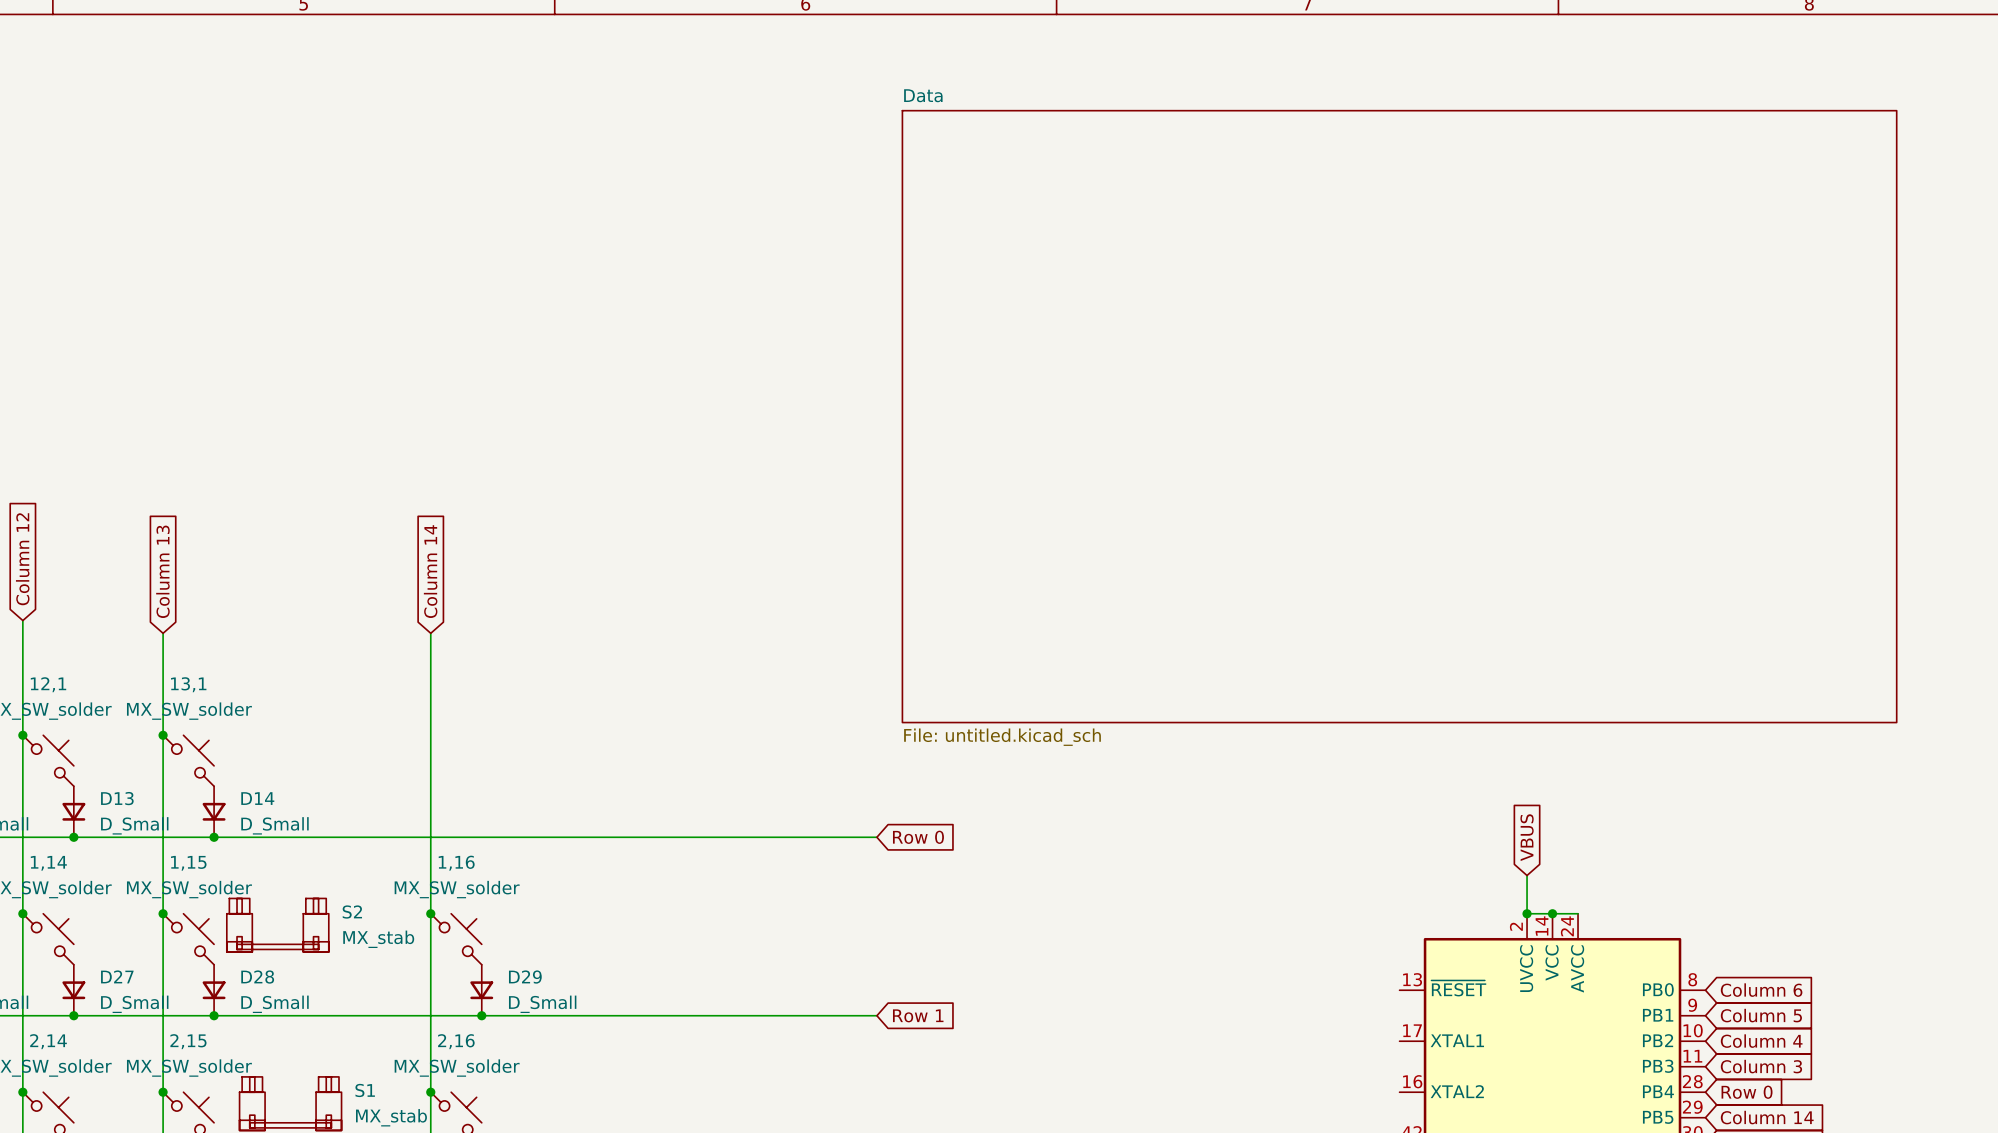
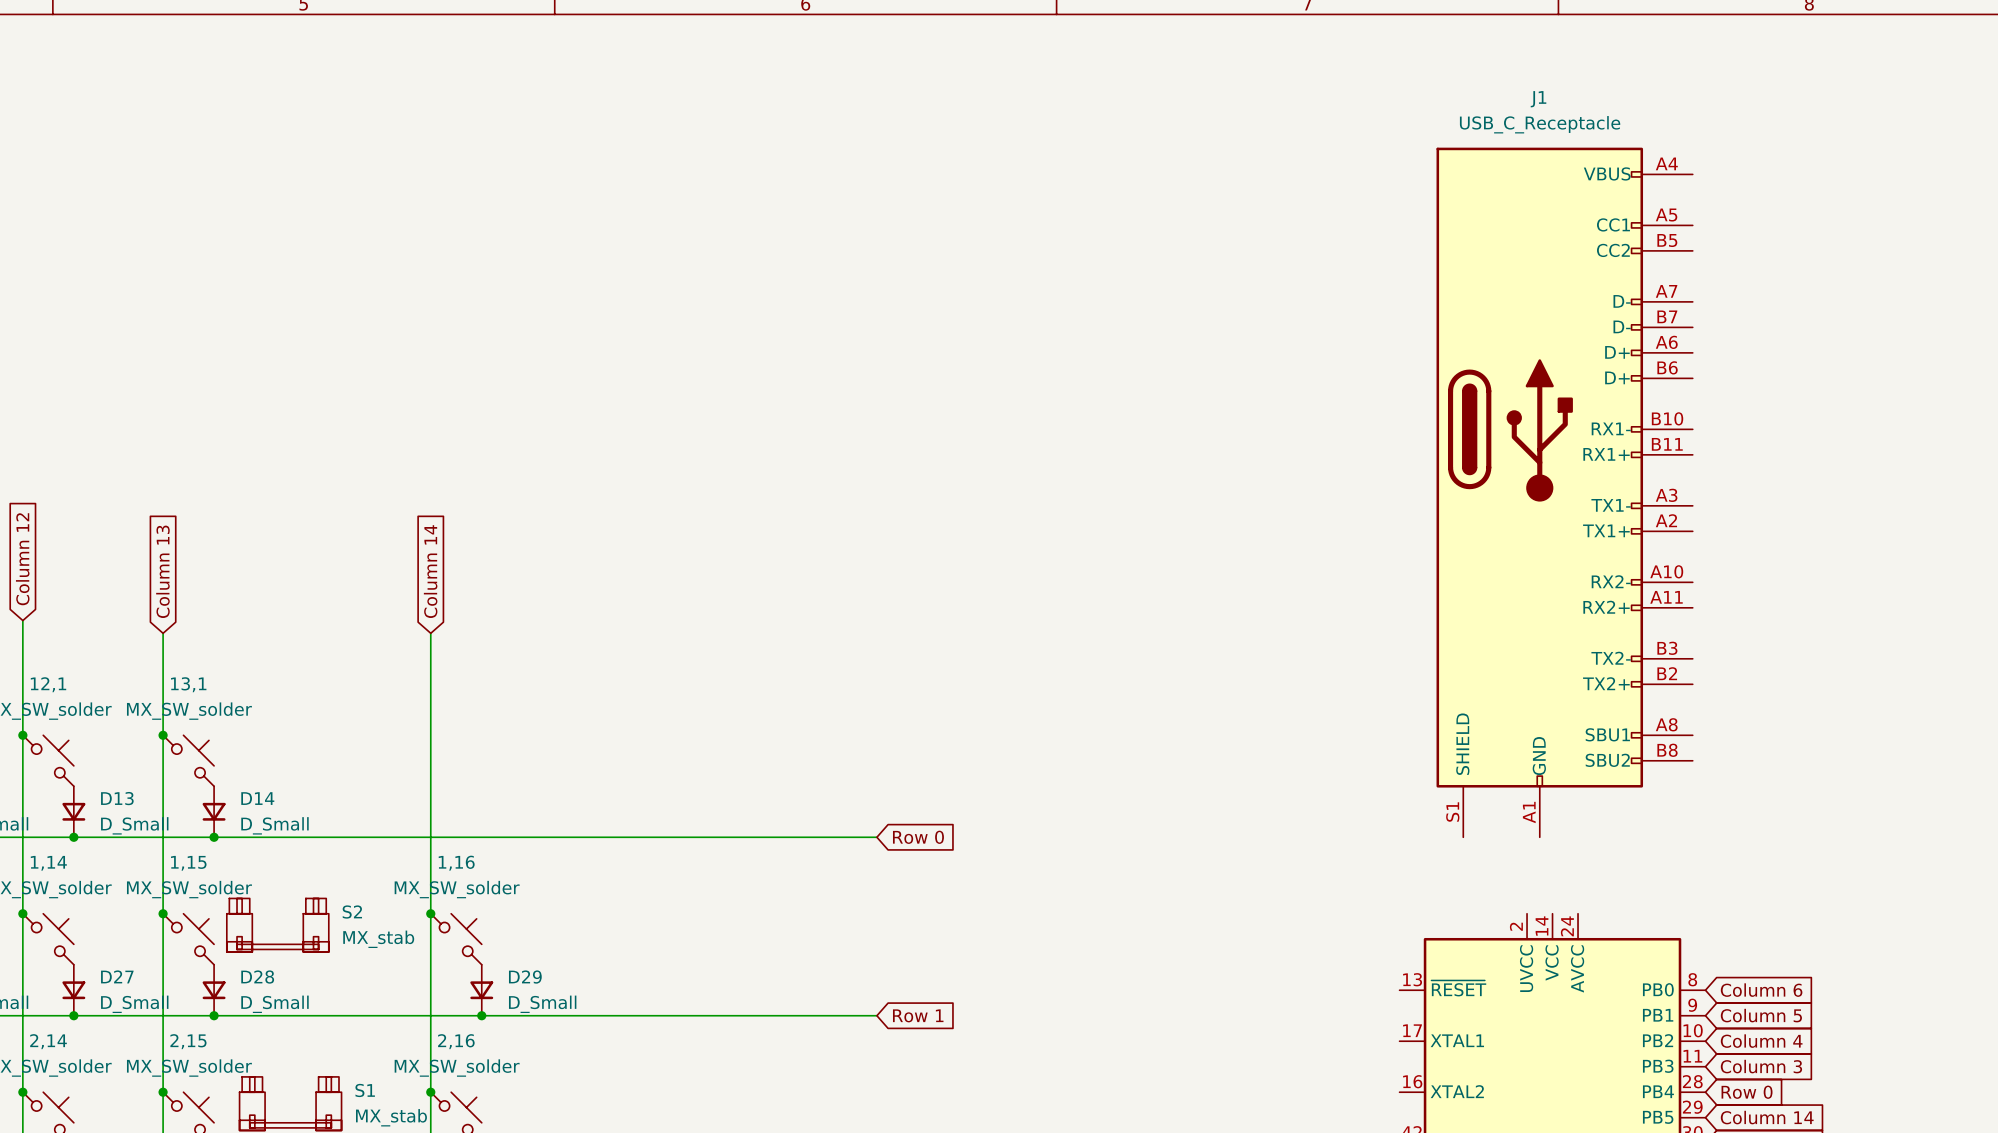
sheet Data: File: untitled.kicad_sch (1399, 416) -> none
J1: none -> USB_C_Receptacle (1564, 492)
global label: VBUS (1527, 837) -> none
wire: (1527, 875) (1527, 913) (1578, 913) -> none
junction: (1527, 913) -> none
junction: (1552, 913) -> none

